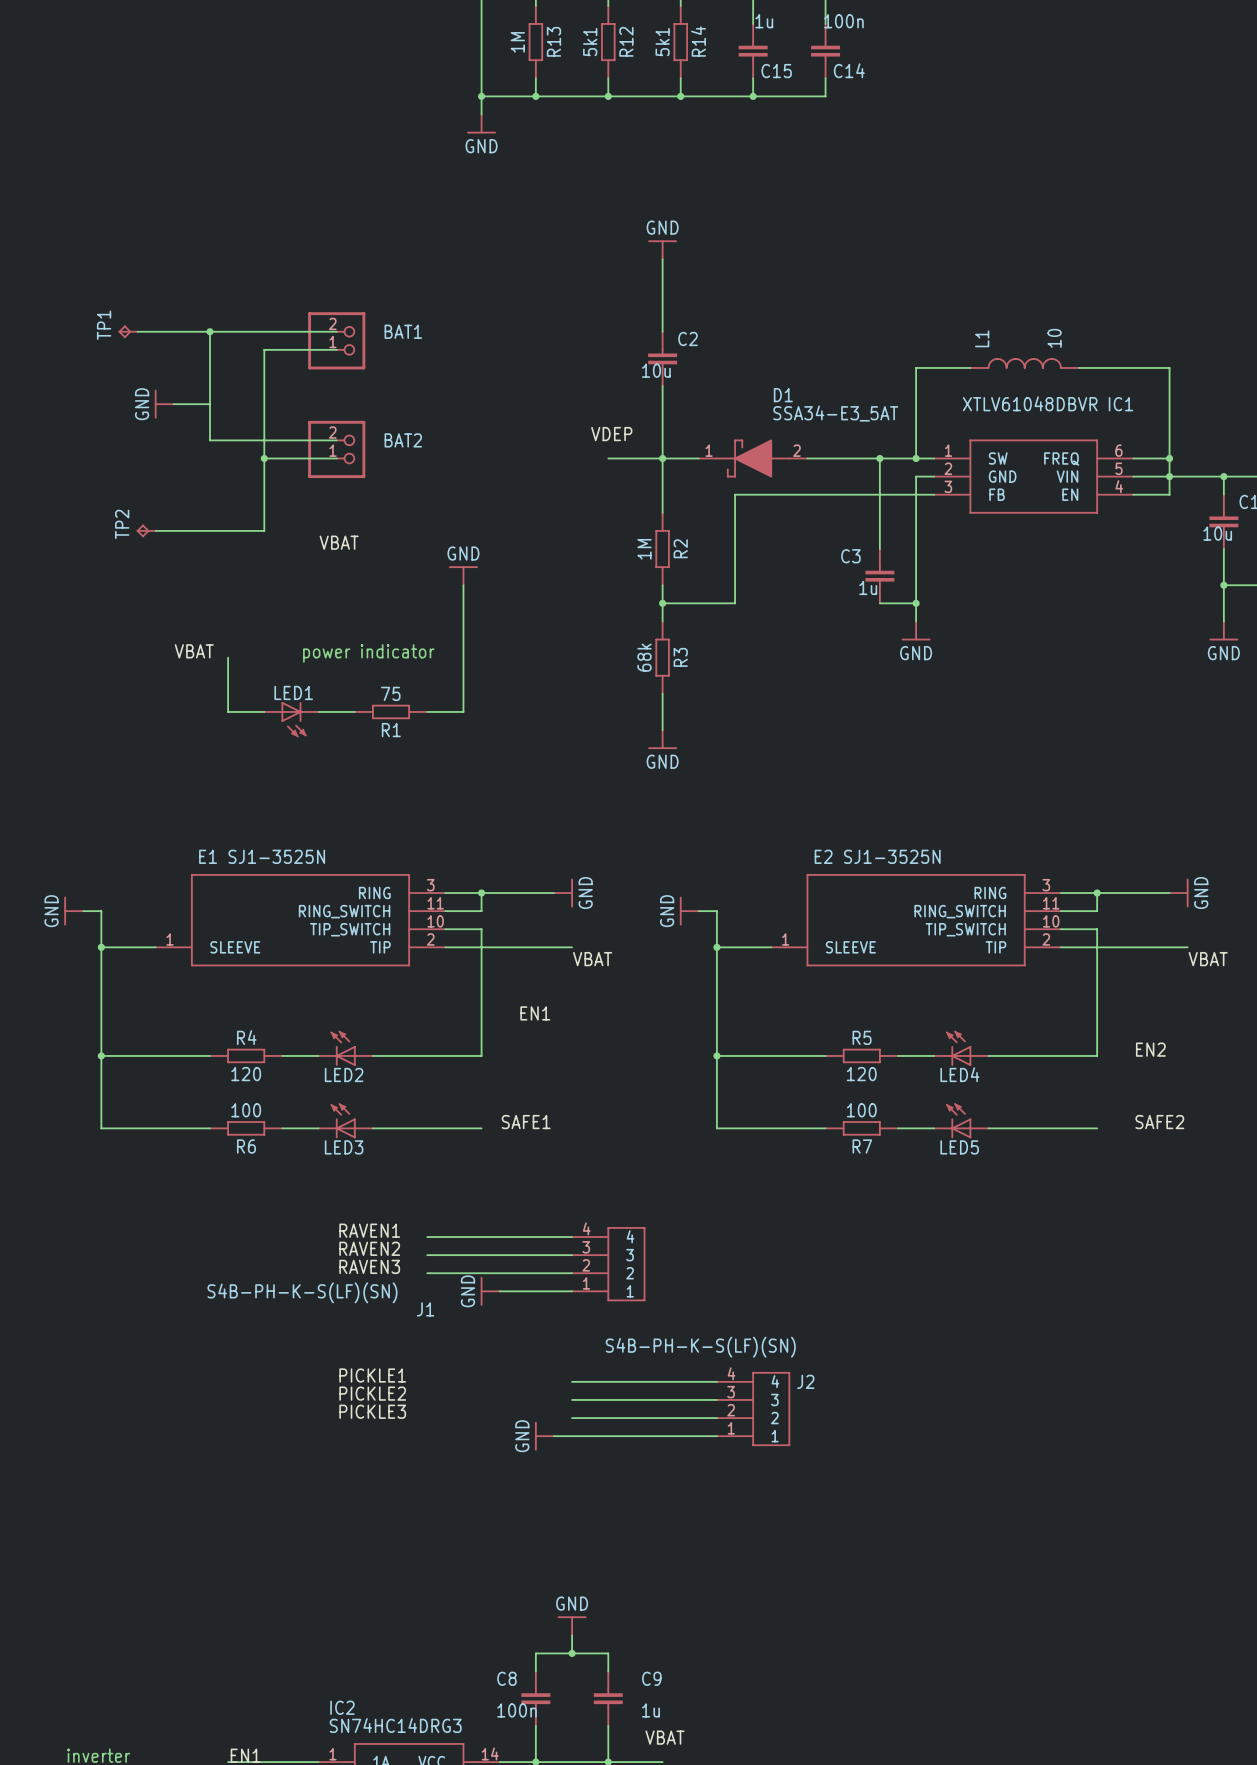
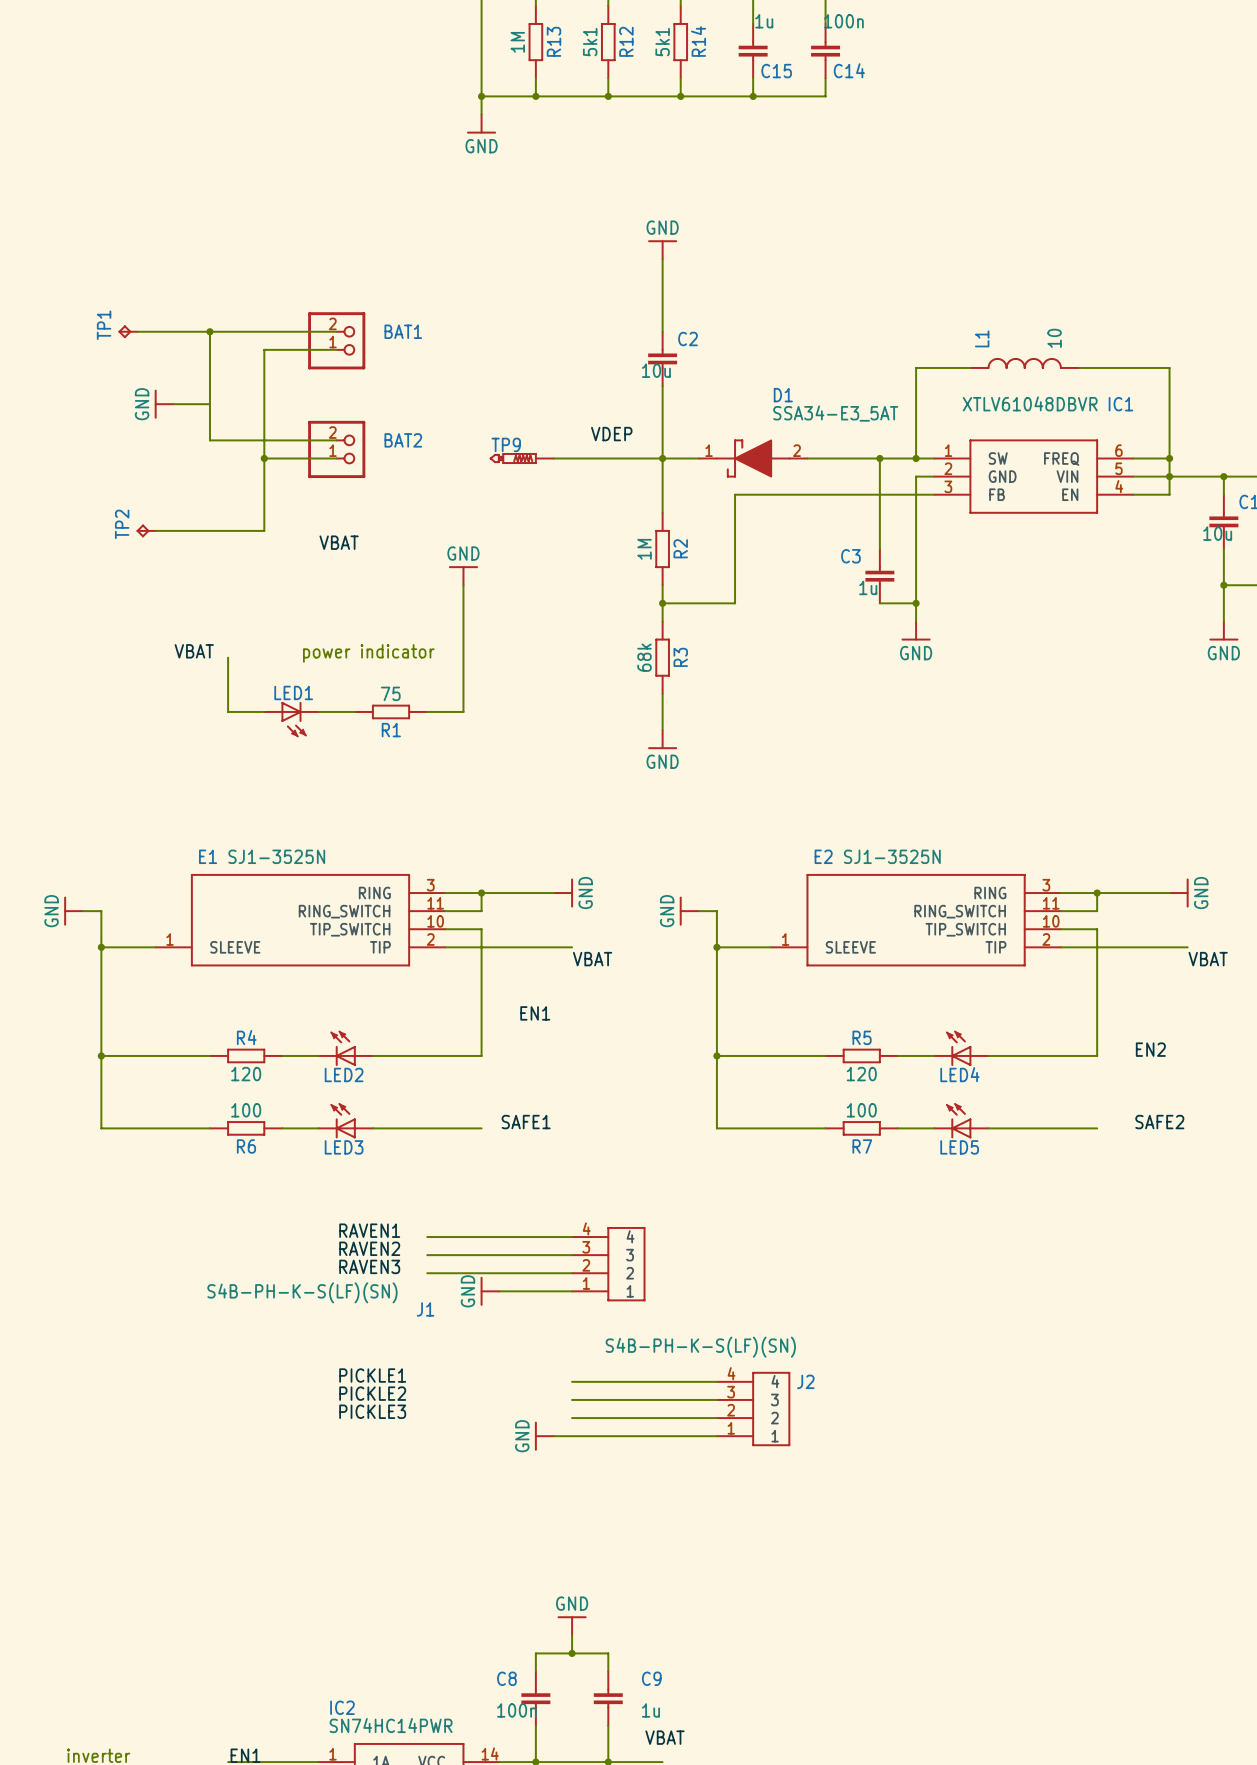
TP9: none -> (522, 458)
wire: none -> (553, 458) (608, 458)
IC2 value: SN74HC14DRG3 (395, 1725) -> SN74HC14PWR (391, 1725)

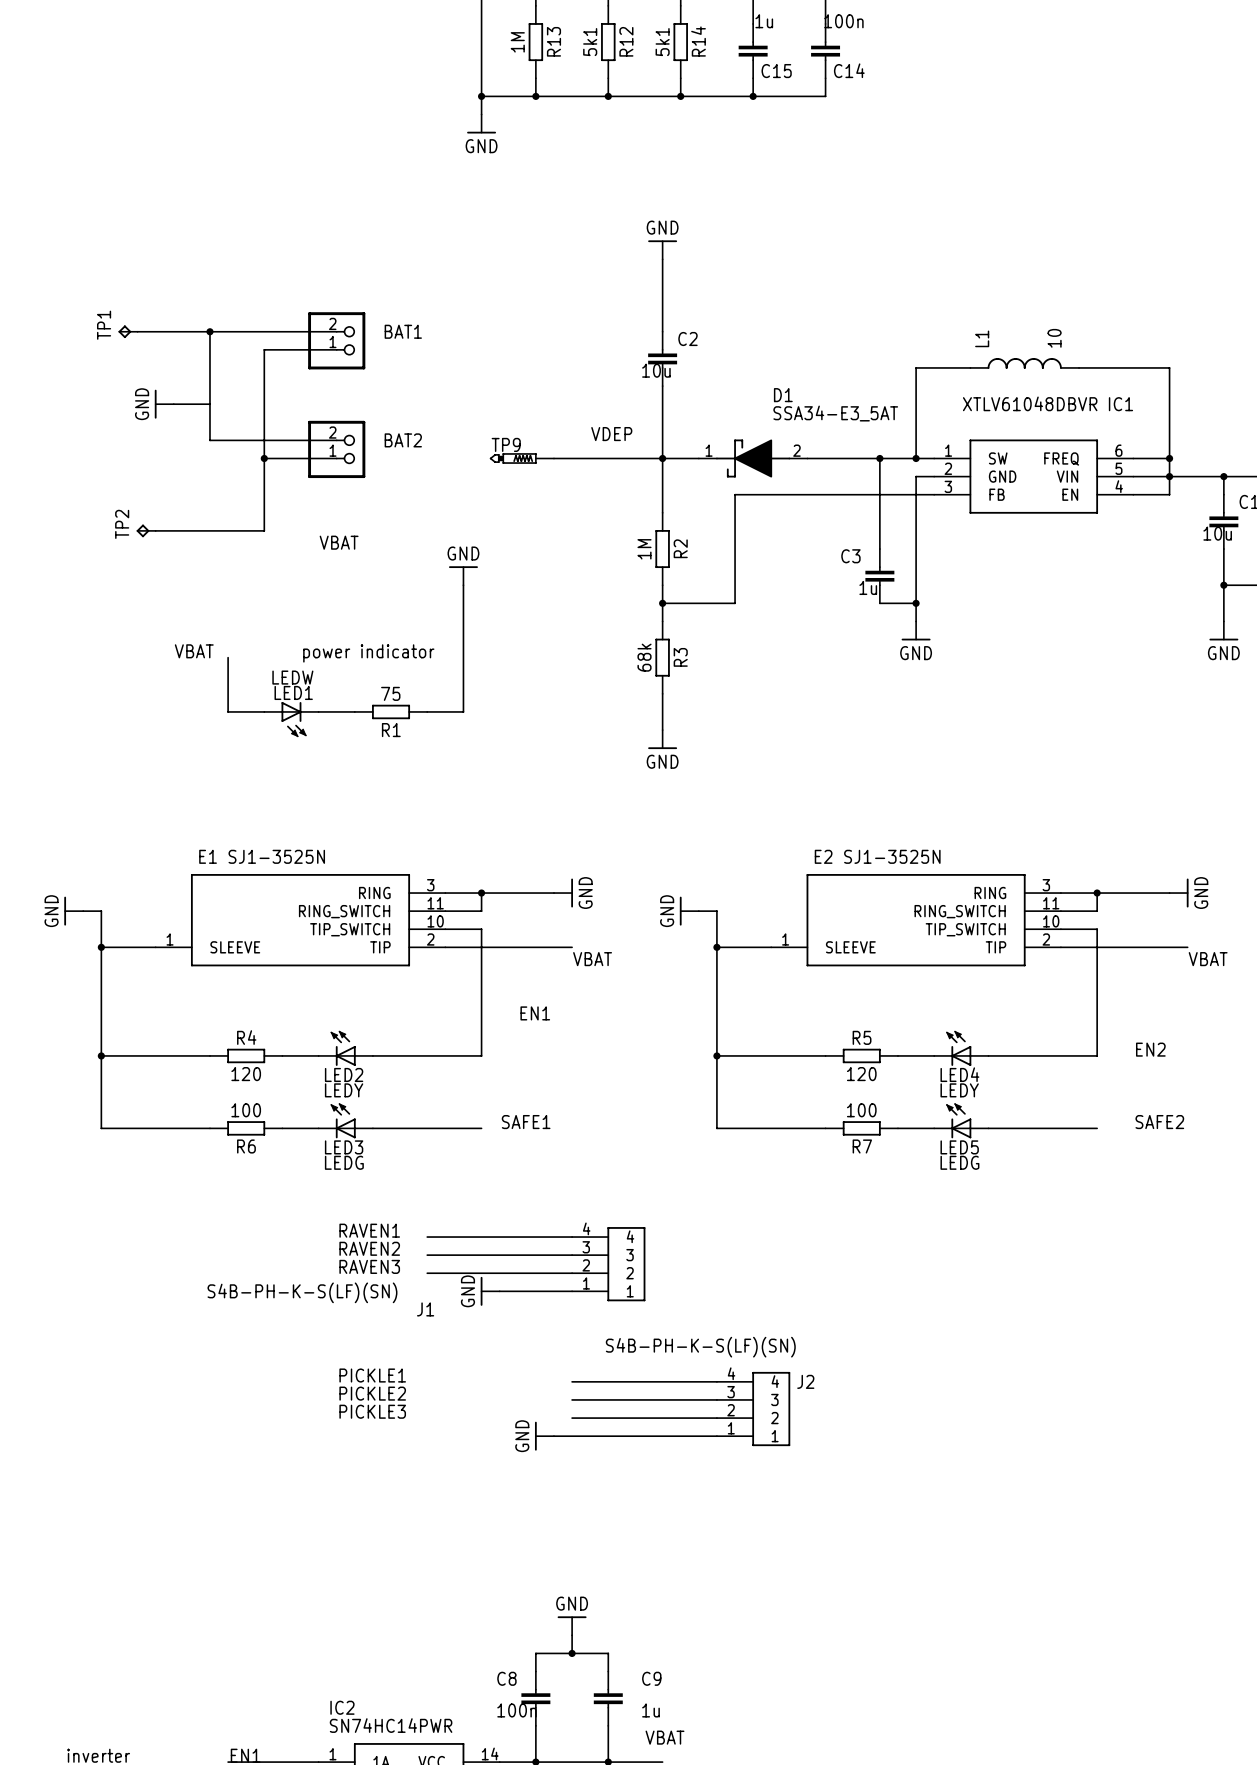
LED1 value: none -> LEDW (292, 677)
LED2 value: none -> LEDY (344, 1090)
LED4 value: none -> LEDY (959, 1090)
LED3 value: none -> LEDG (344, 1162)
LED5 value: none -> LEDG (959, 1162)

